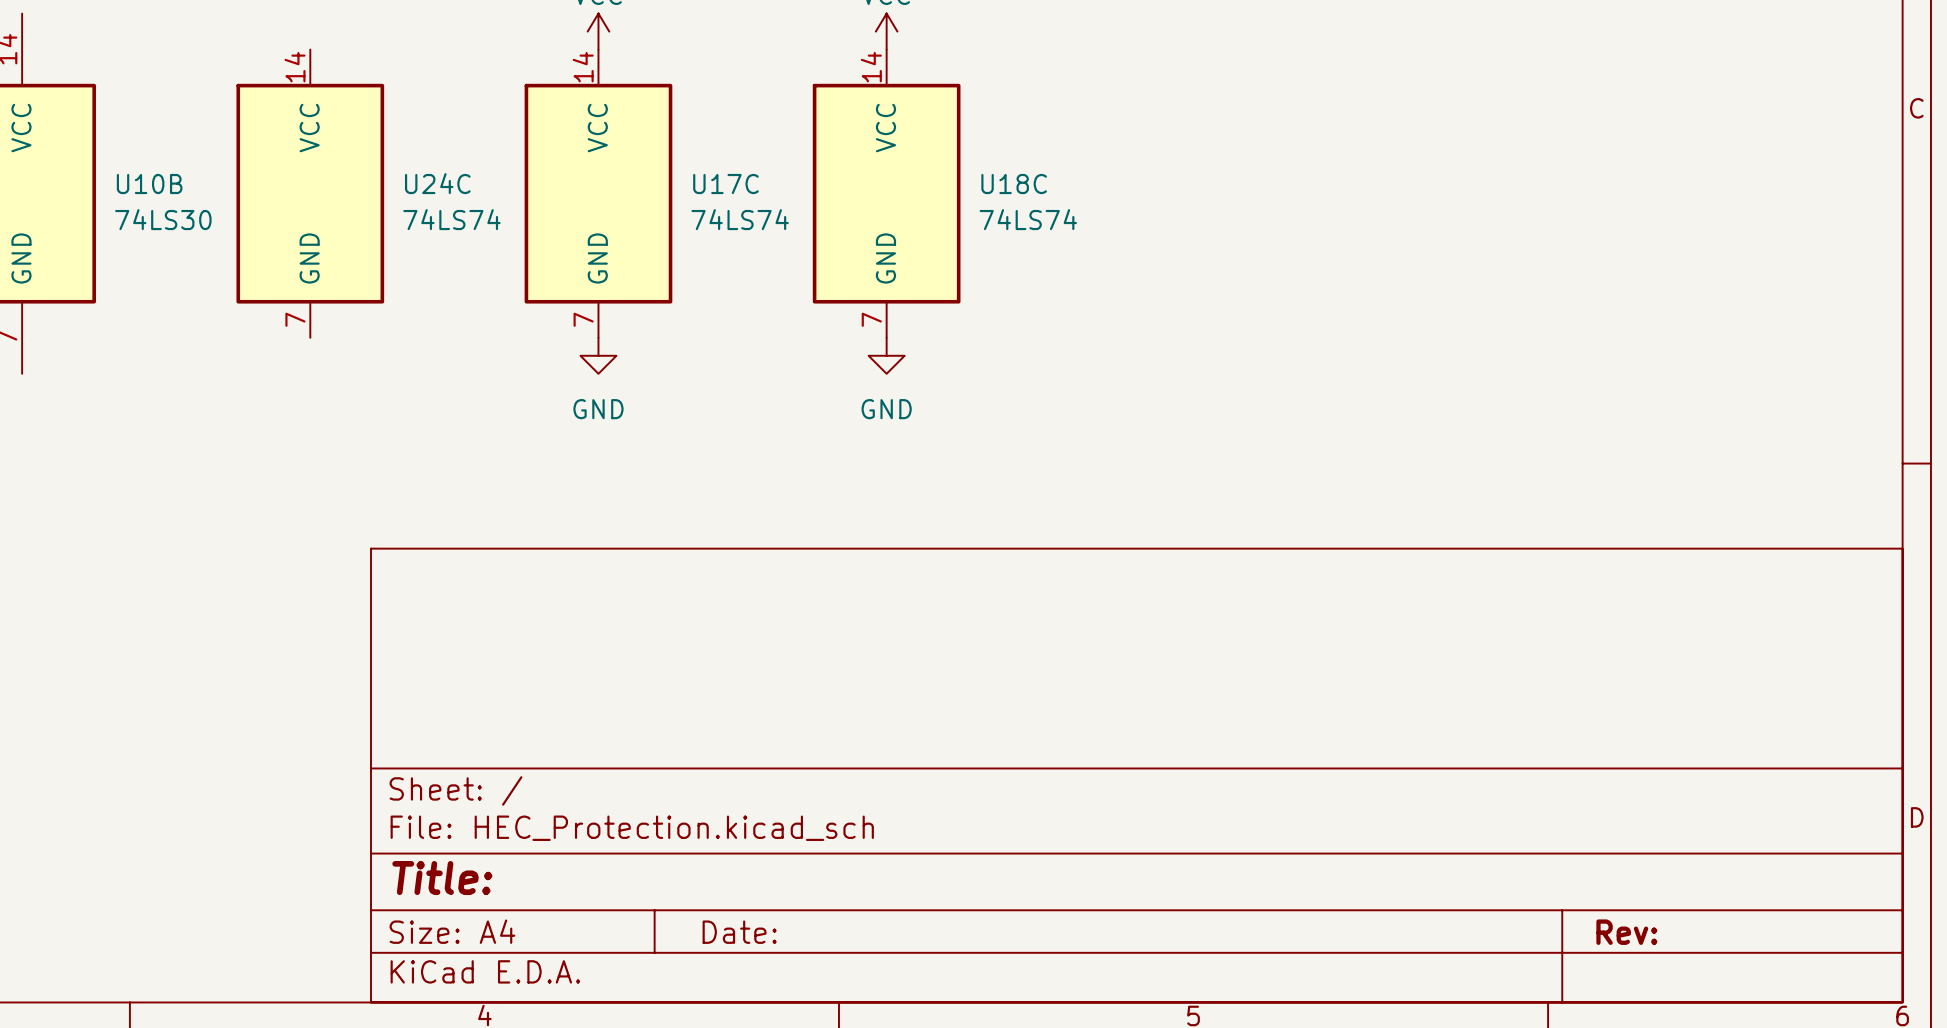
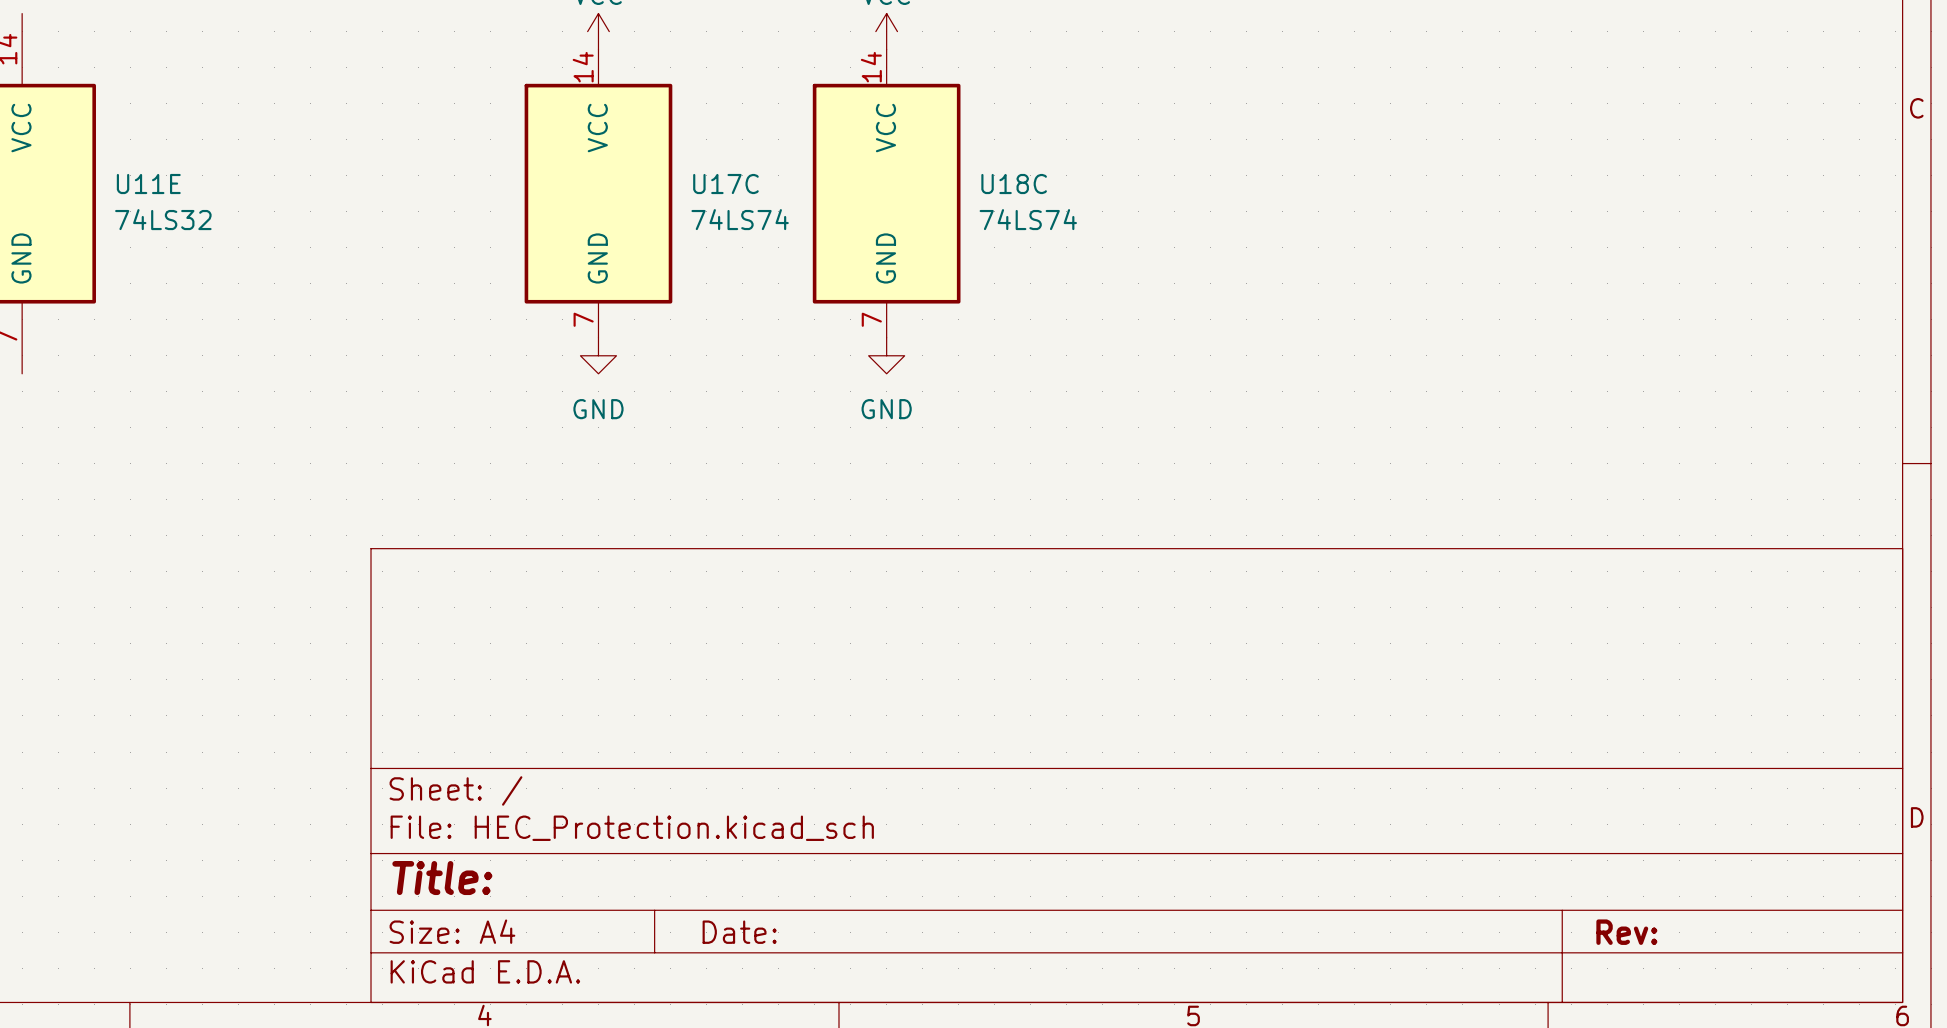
U10B name: U10B (149, 184) -> U11E (148, 184)
U24C: 74LS74 (310, 193) -> none
U10B value: 74LS30 (163, 219) -> 74LS32 (163, 219)

